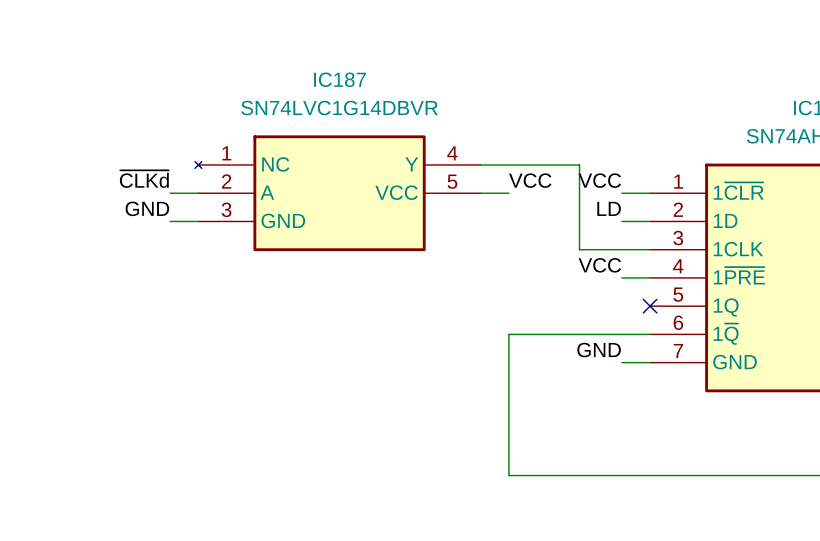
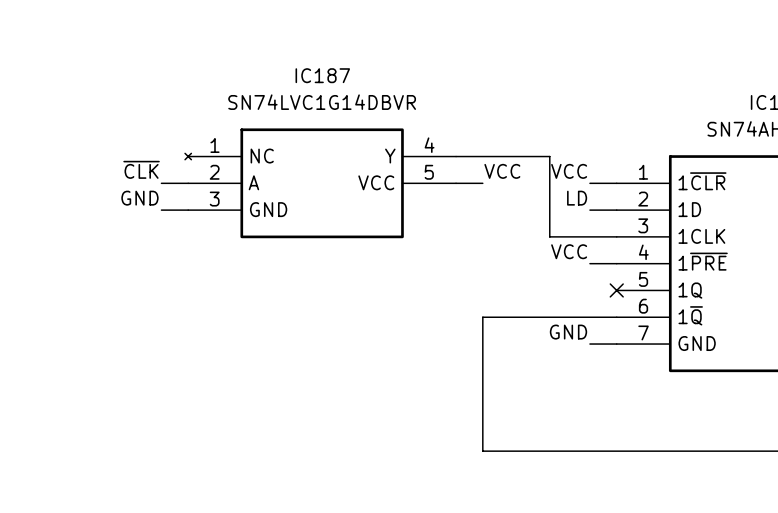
label: ~{CLKd} (144, 179) -> ~{CLK} (141, 169)

